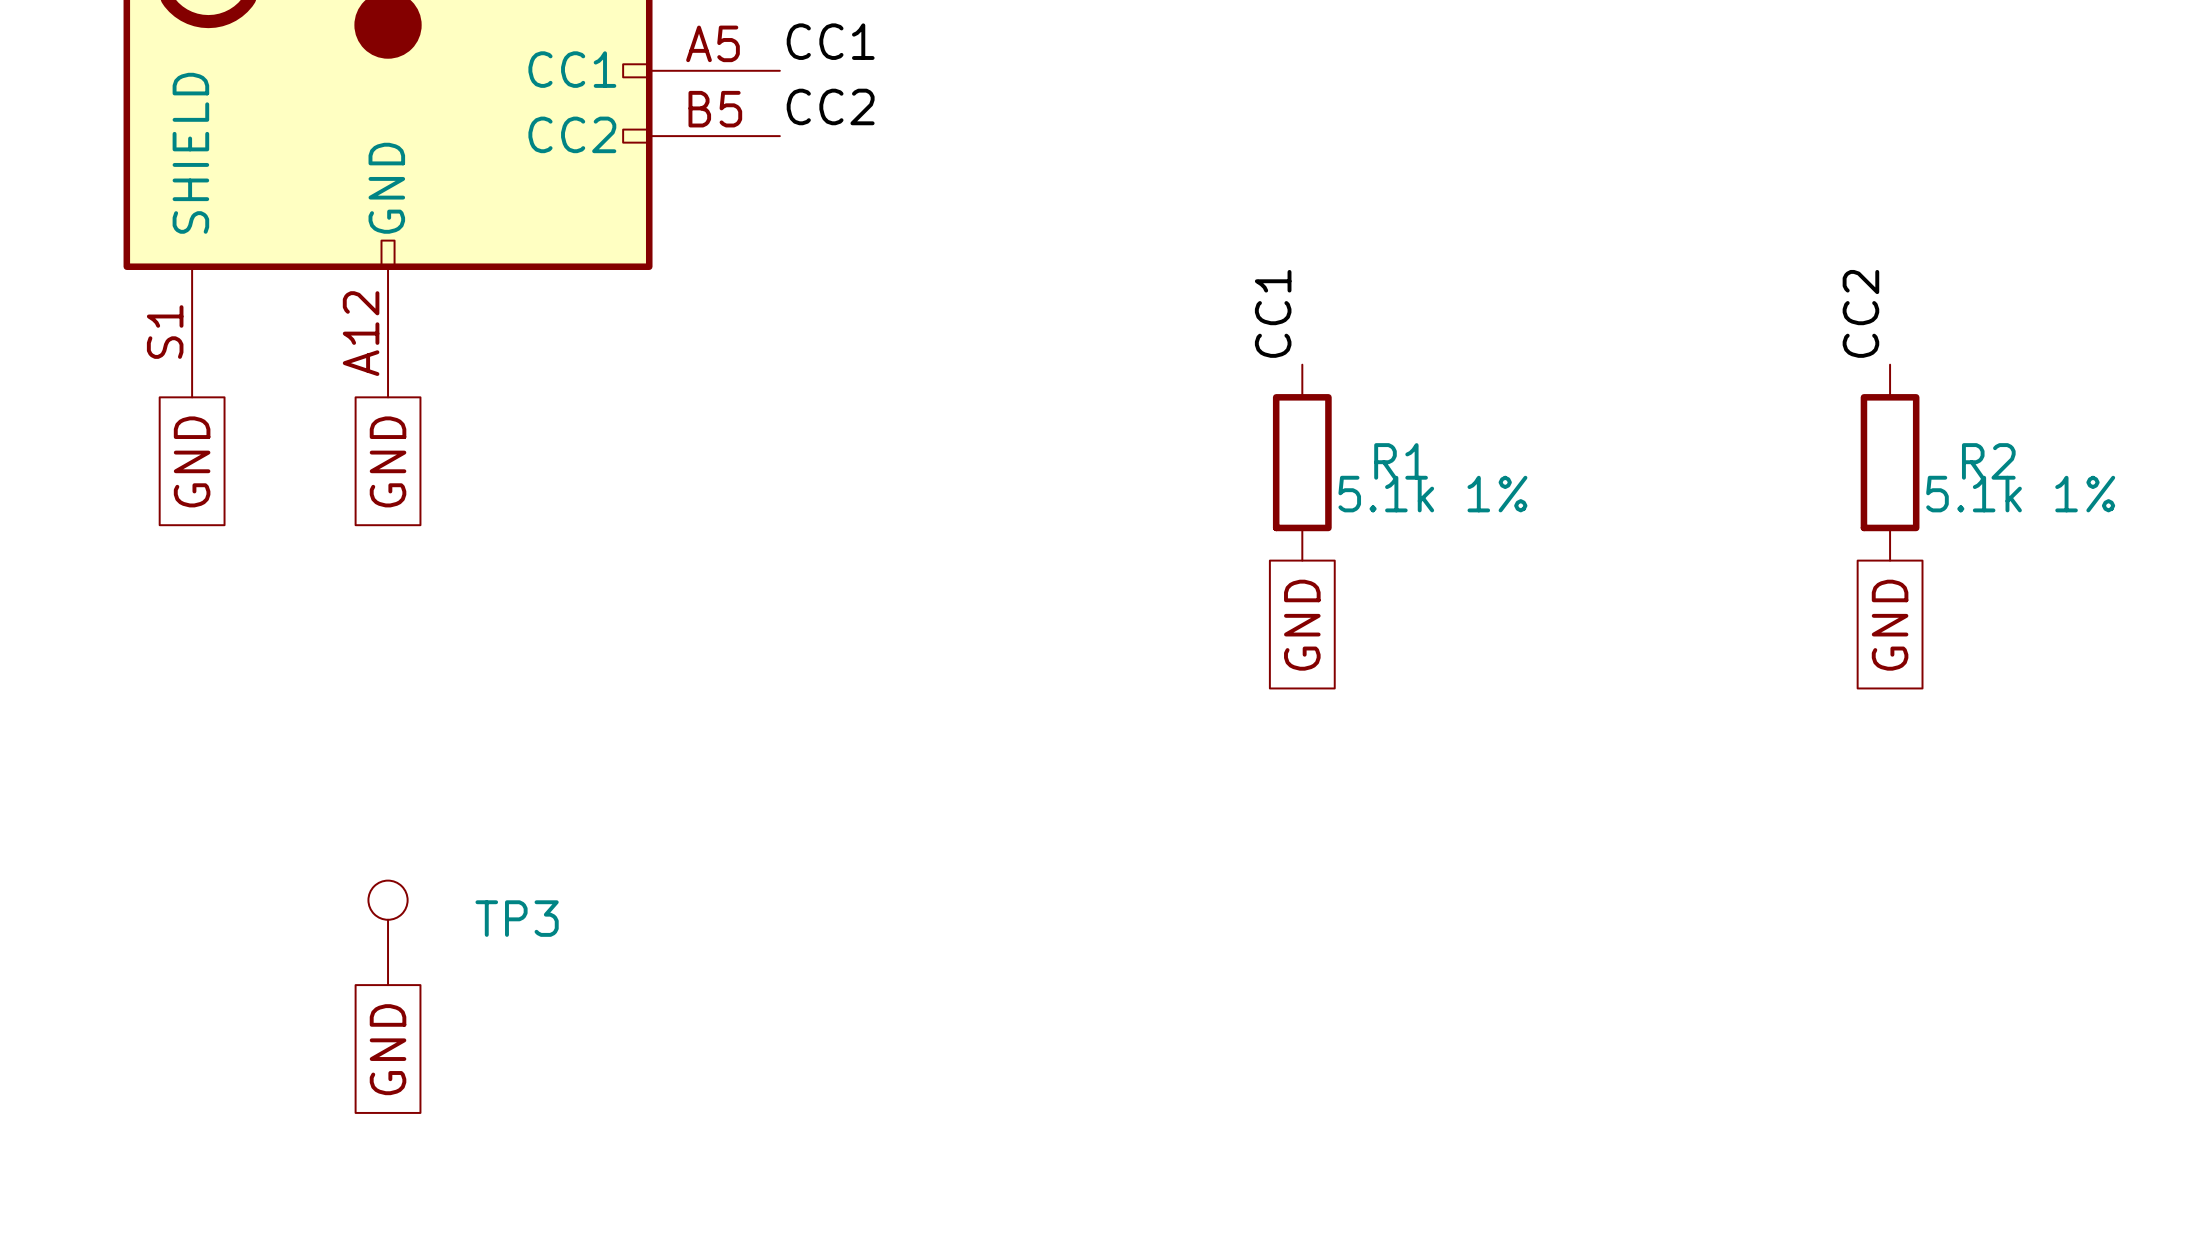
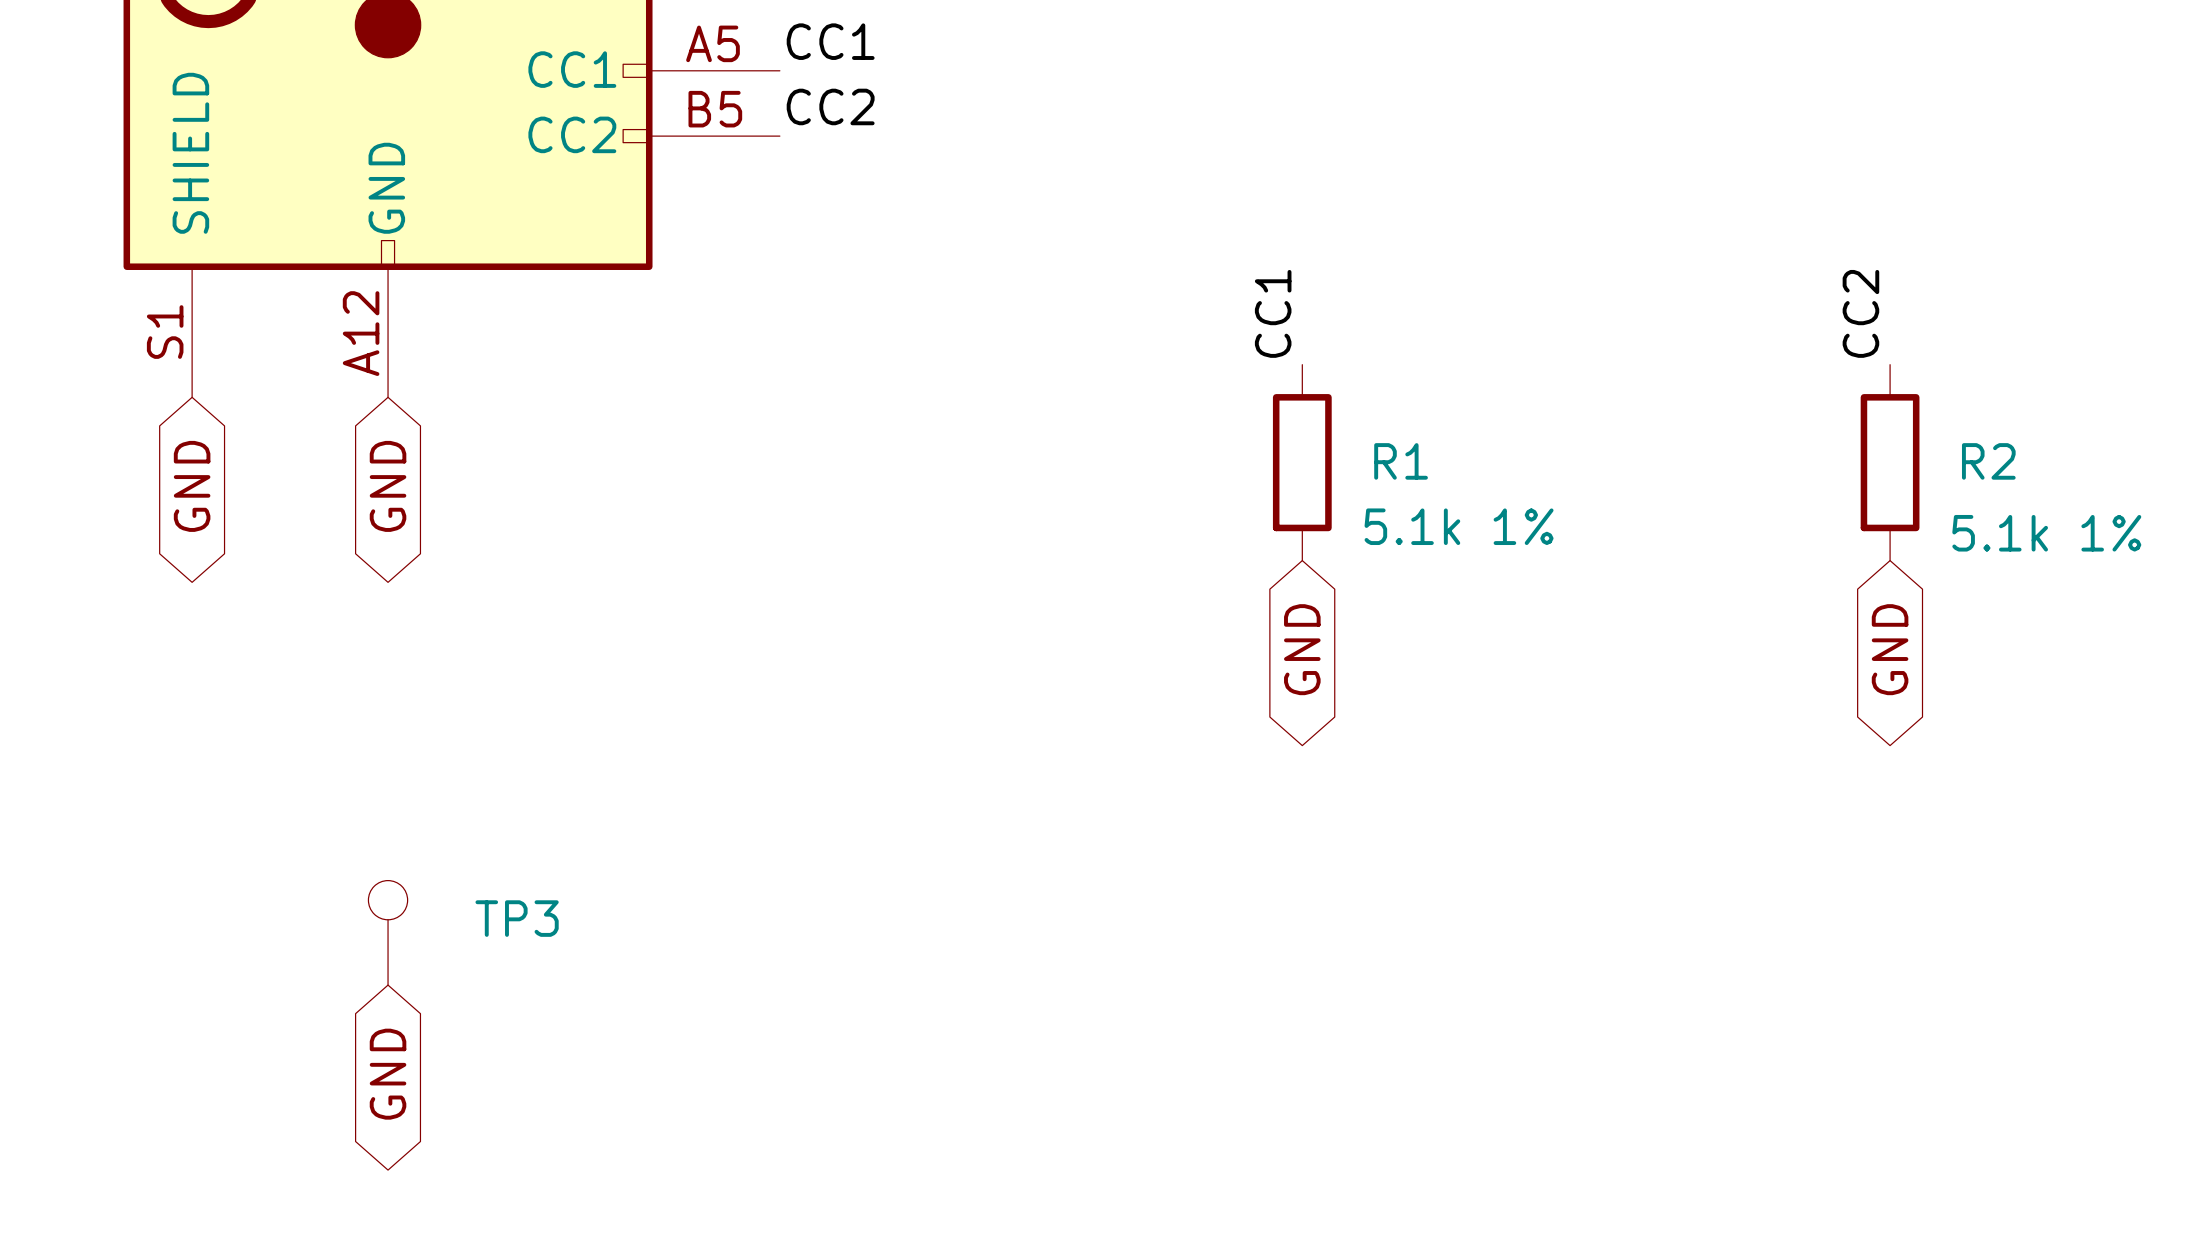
global label shape: passive (192, 461) -> bidirectional (192, 486)
global label shape: passive (388, 461) -> bidirectional (388, 486)
R1 value position: 5.1k 1% (1432, 494) -> 5.1k 1% (1459, 526)
R2 value position: 5.1k 1% (2020, 494) -> 5.1k 1% (2046, 533)
global label shape: passive (1302, 625) -> bidirectional (1302, 649)
global label shape: passive (1890, 625) -> bidirectional (1890, 649)
global label shape: passive (388, 1049) -> bidirectional (388, 1074)

